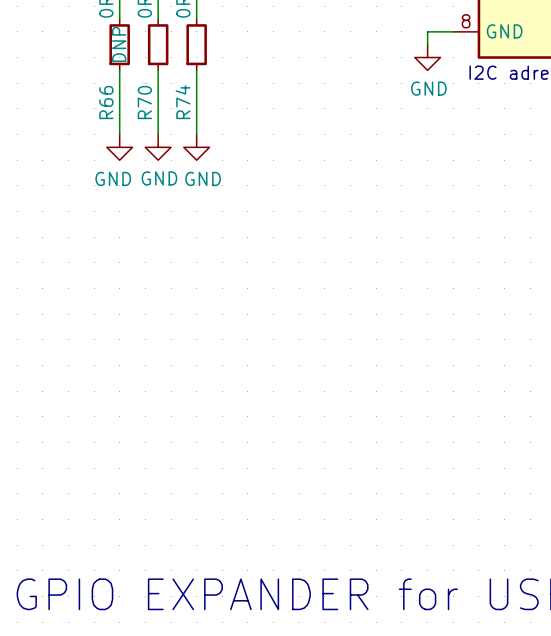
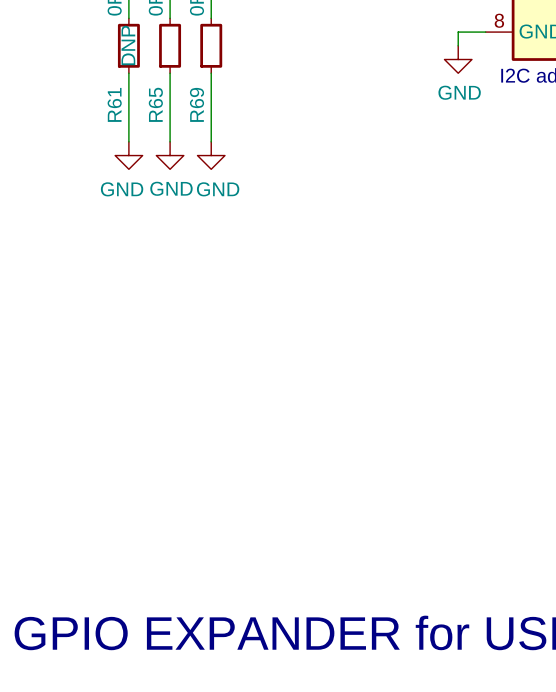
R66 name: R66 (106, 102) -> R61 (114, 104)
R70 name: R70 (144, 102) -> R65 (155, 104)
R74 name: R74 (183, 102) -> R69 (197, 104)

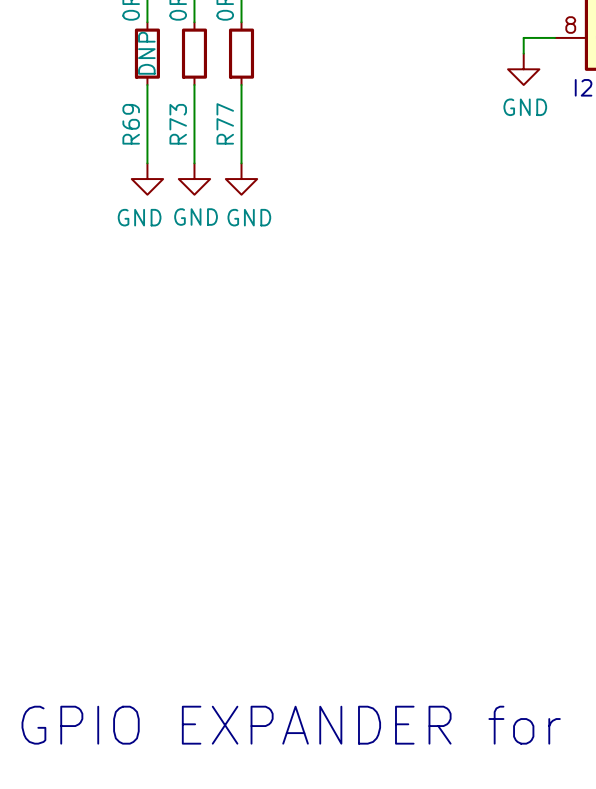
R61 name: R61 (114, 104) -> R69 (131, 124)
R65 name: R65 (155, 104) -> R73 (178, 124)
R69 name: R69 (197, 104) -> R77 (225, 123)

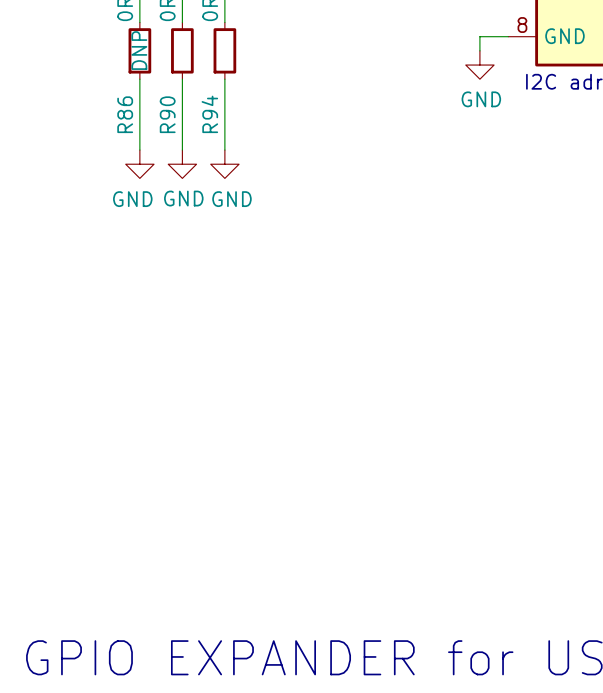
R77 name: R77 (225, 123) -> R94 (209, 114)
R69 name: R69 (131, 124) -> R86 (125, 114)
R73 name: R73 (178, 124) -> R90 (167, 114)

